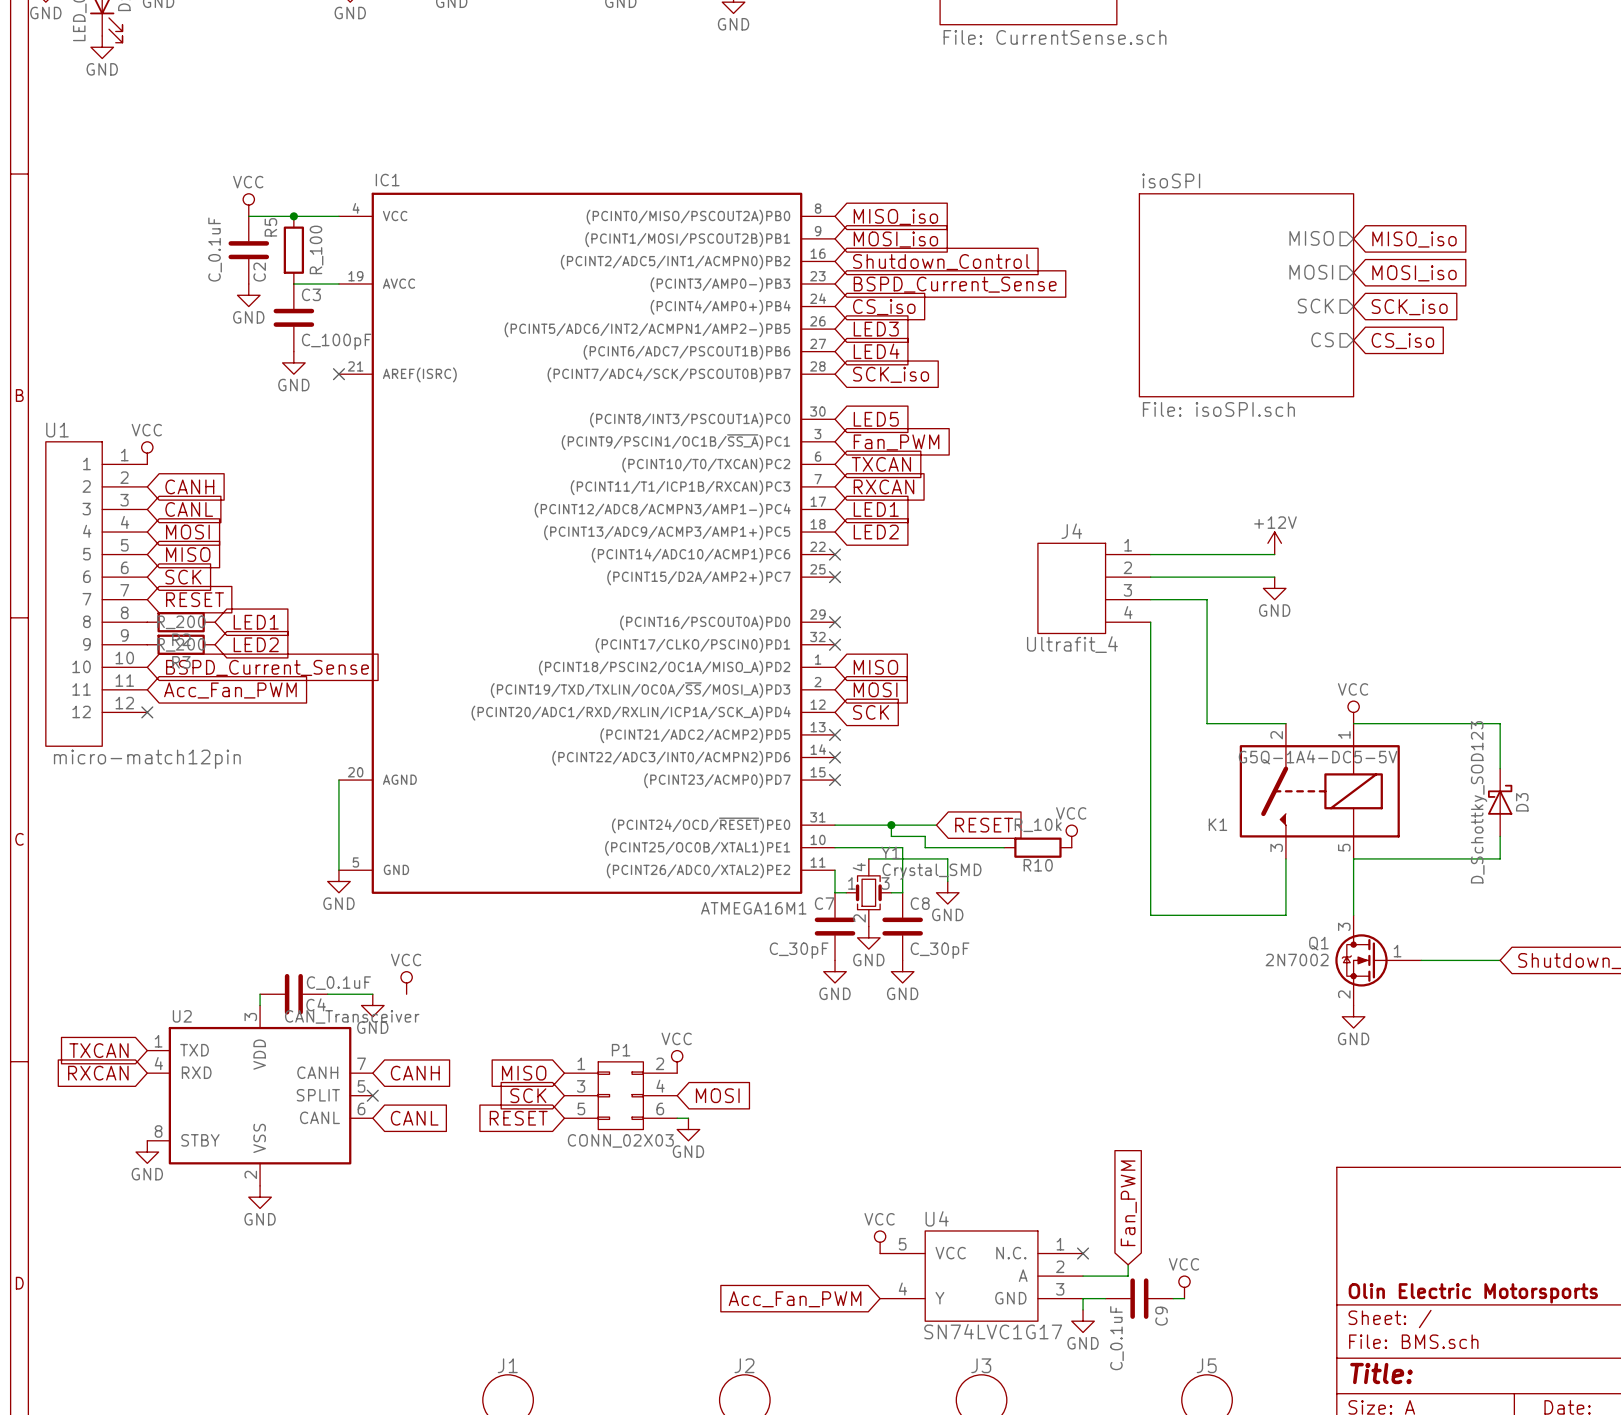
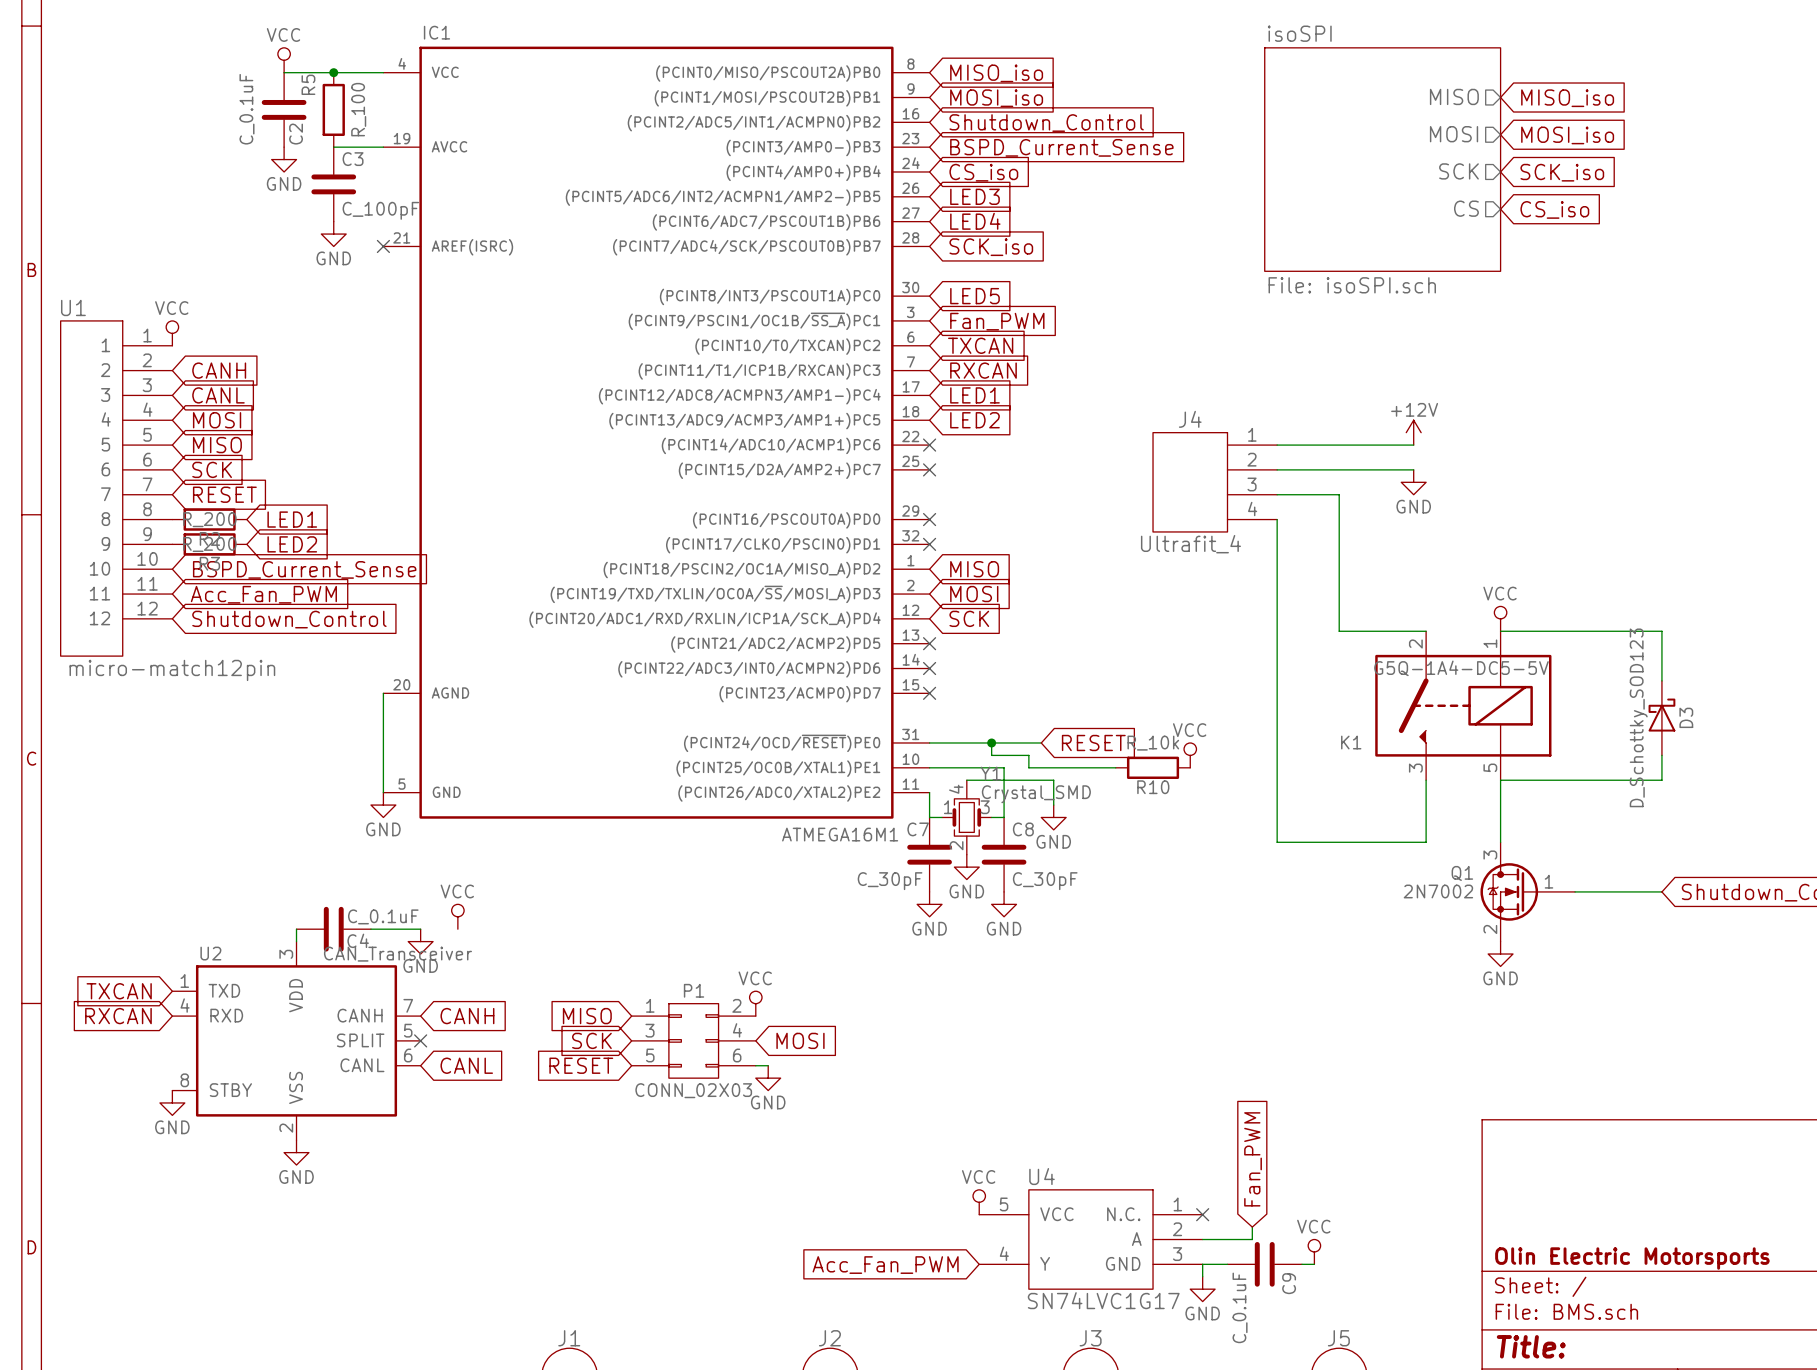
no-connect mark: (147, 712) -> none
global label: none -> Shutdown_Control (289, 619)

